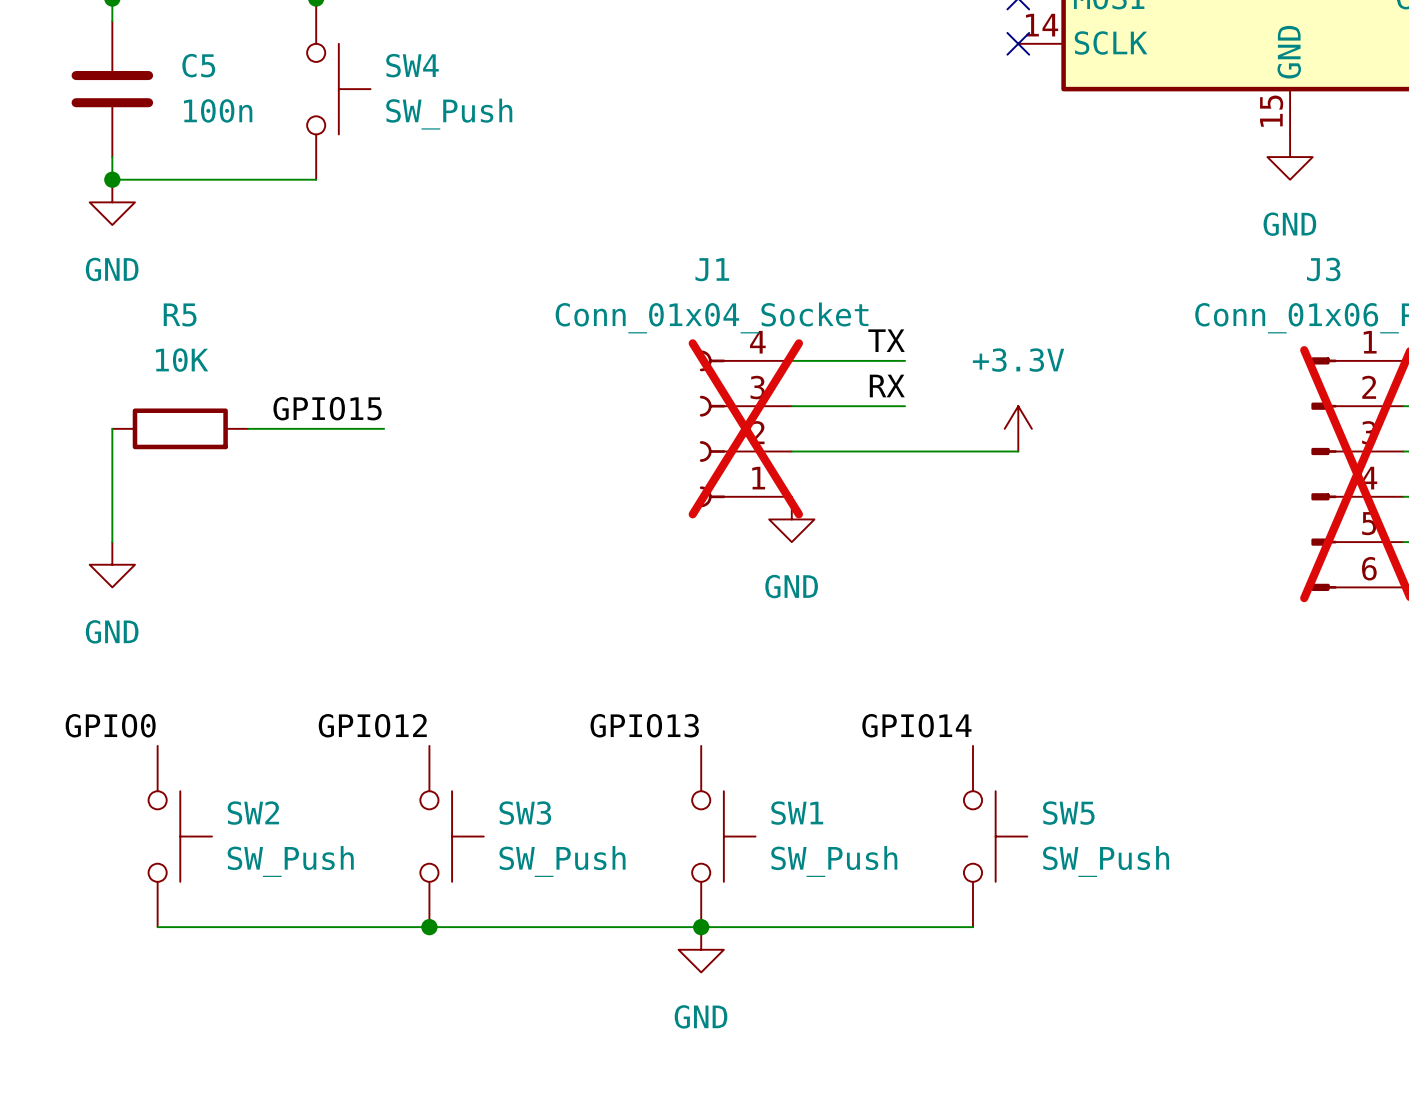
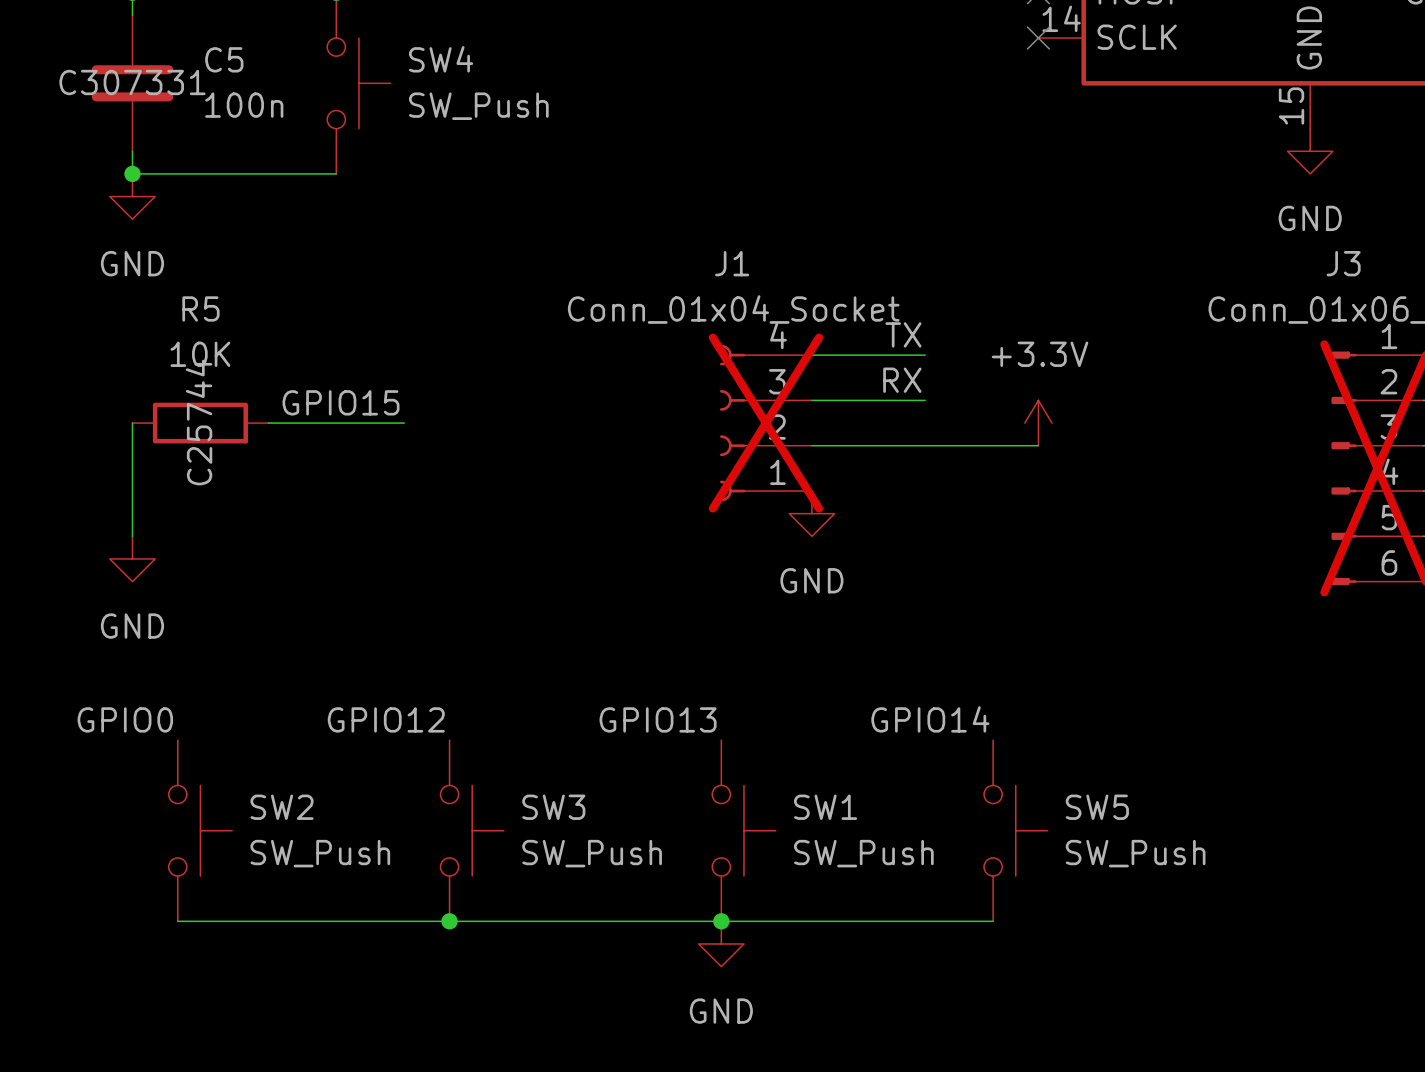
C5 text: none -> C307331 (132, 82)
R5 text: none -> C25744 (199, 422)

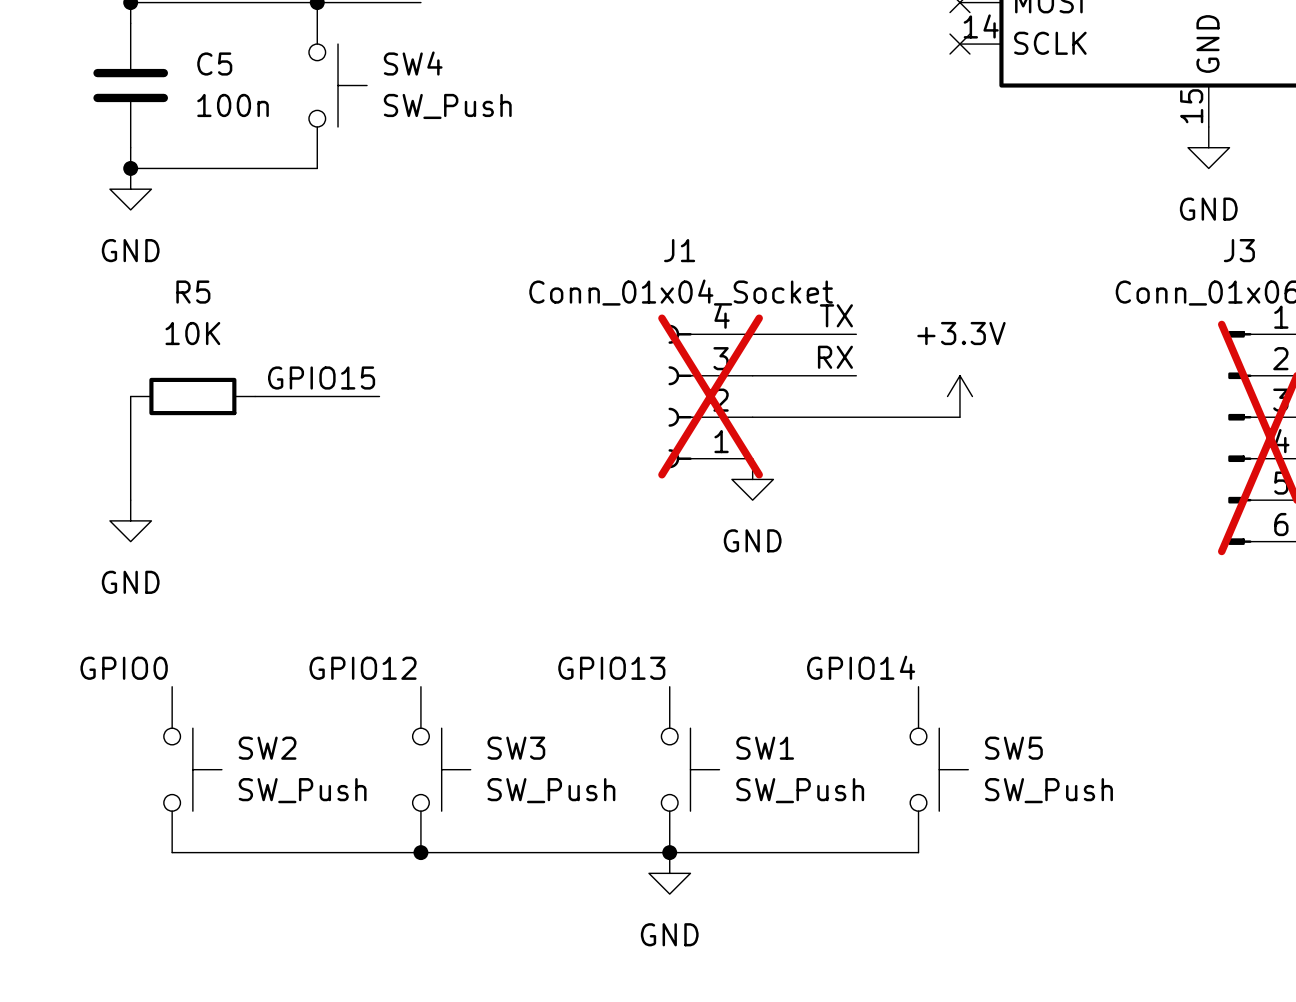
C5 text: C307331 (132, 82) -> none
R5 text: C25744 (199, 422) -> none

